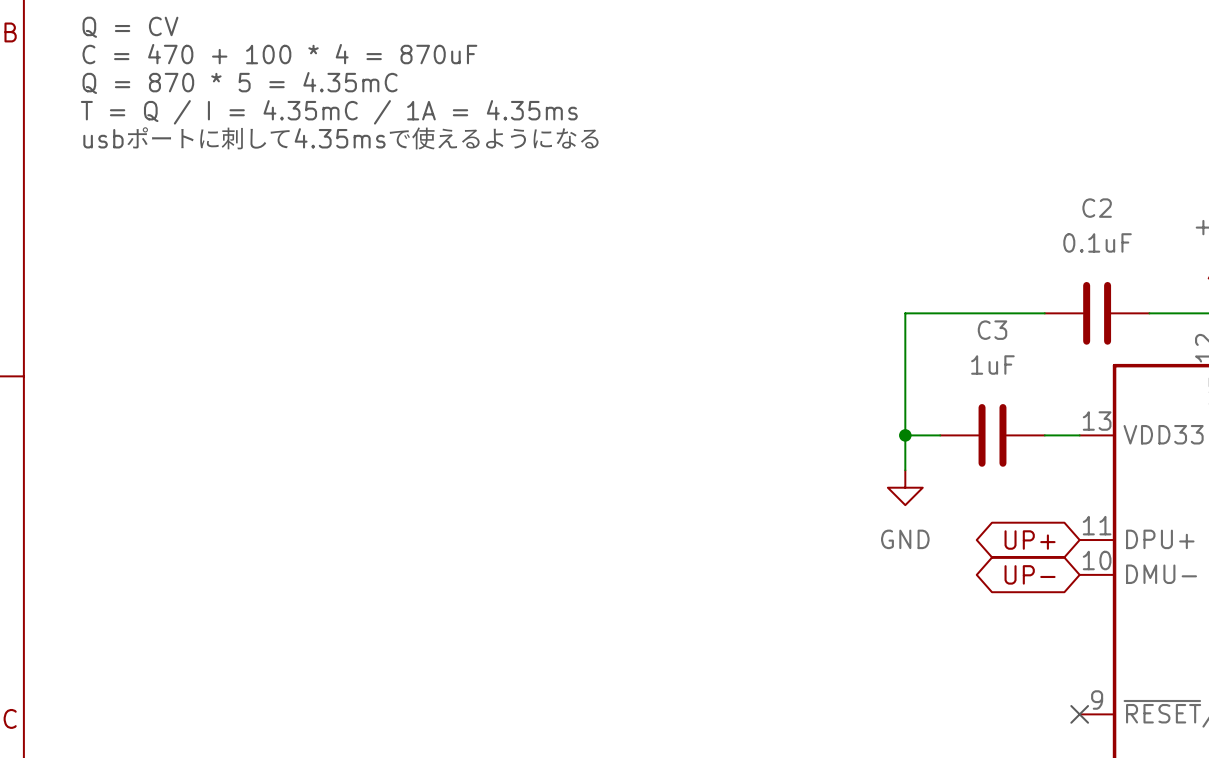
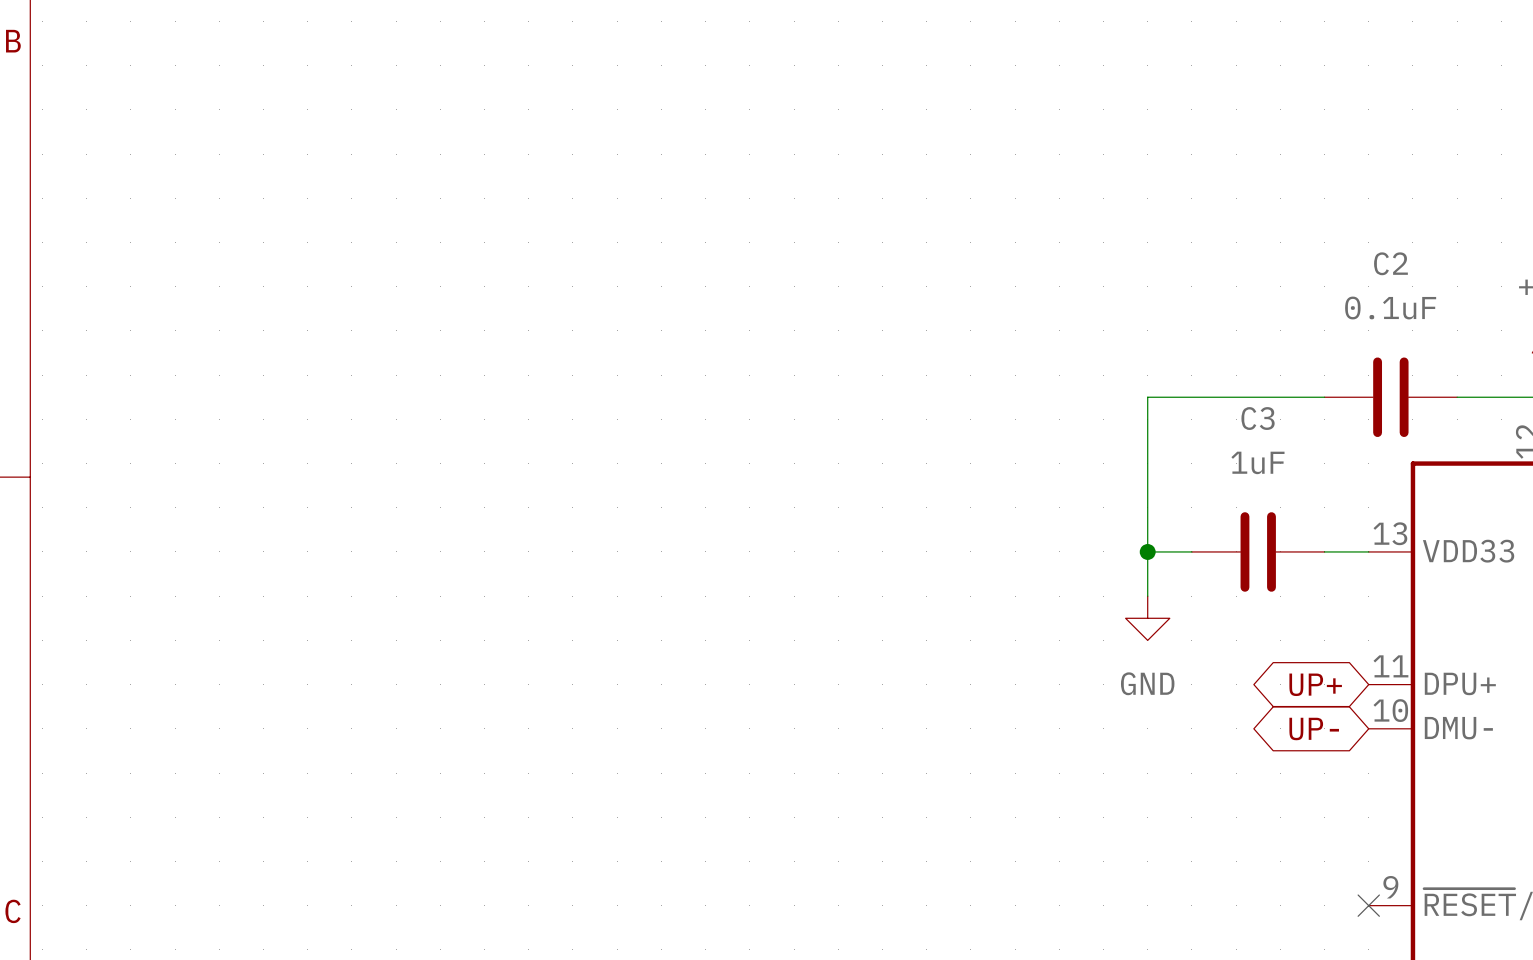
text: Q = CV (130, 27) -> none
text: C = 470 + 100 * 4 = 870uF (279, 54) -> none
text: Q = 870 * 5 = 4.35mC (240, 83) -> none
text: T = Q / I = 4.35mC / 1A = 4.35ms (329, 112) -> none
text: usbポートに刺して4.35msで使えるようになる (341, 138) -> none

